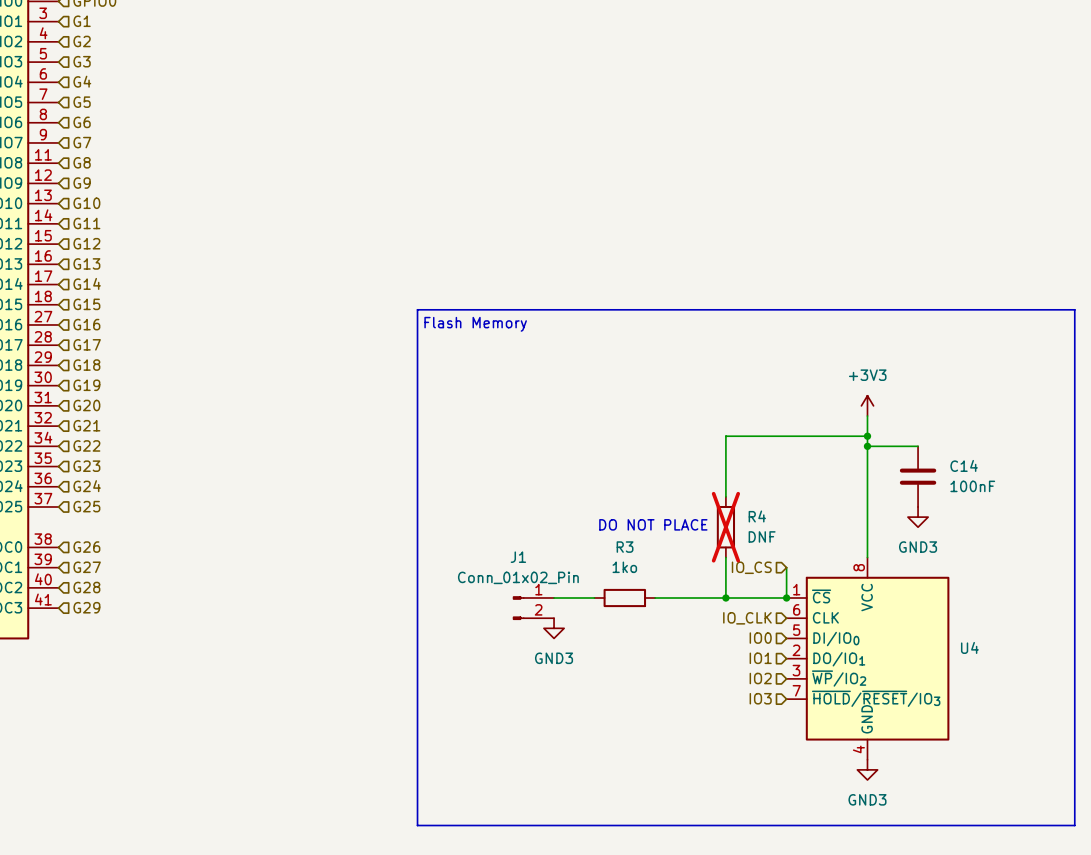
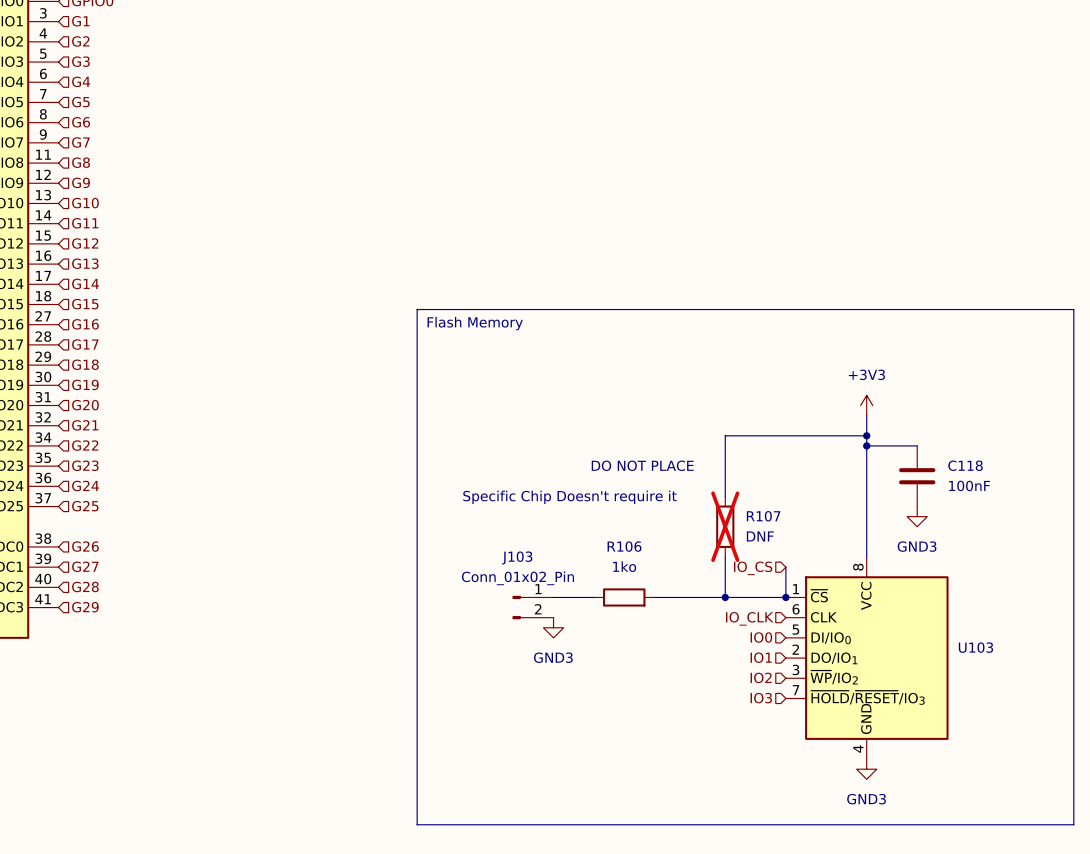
C14 name: C14 (964, 465) -> C118 (965, 465)
text: none -> Specific Chip Doesn't require it (569, 497)
R4 name: R4 (757, 516) -> R107 (763, 516)
text position: DO NOT PLACE (653, 524) -> DO NOT PLACE (642, 465)
R3 name: R3 (625, 547) -> R106 (624, 546)
J1 name: J1 (518, 557) -> J103 (517, 557)
U4 name: U4 (969, 647) -> U103 (975, 647)

